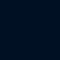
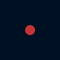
part: none -> (30, 30)

